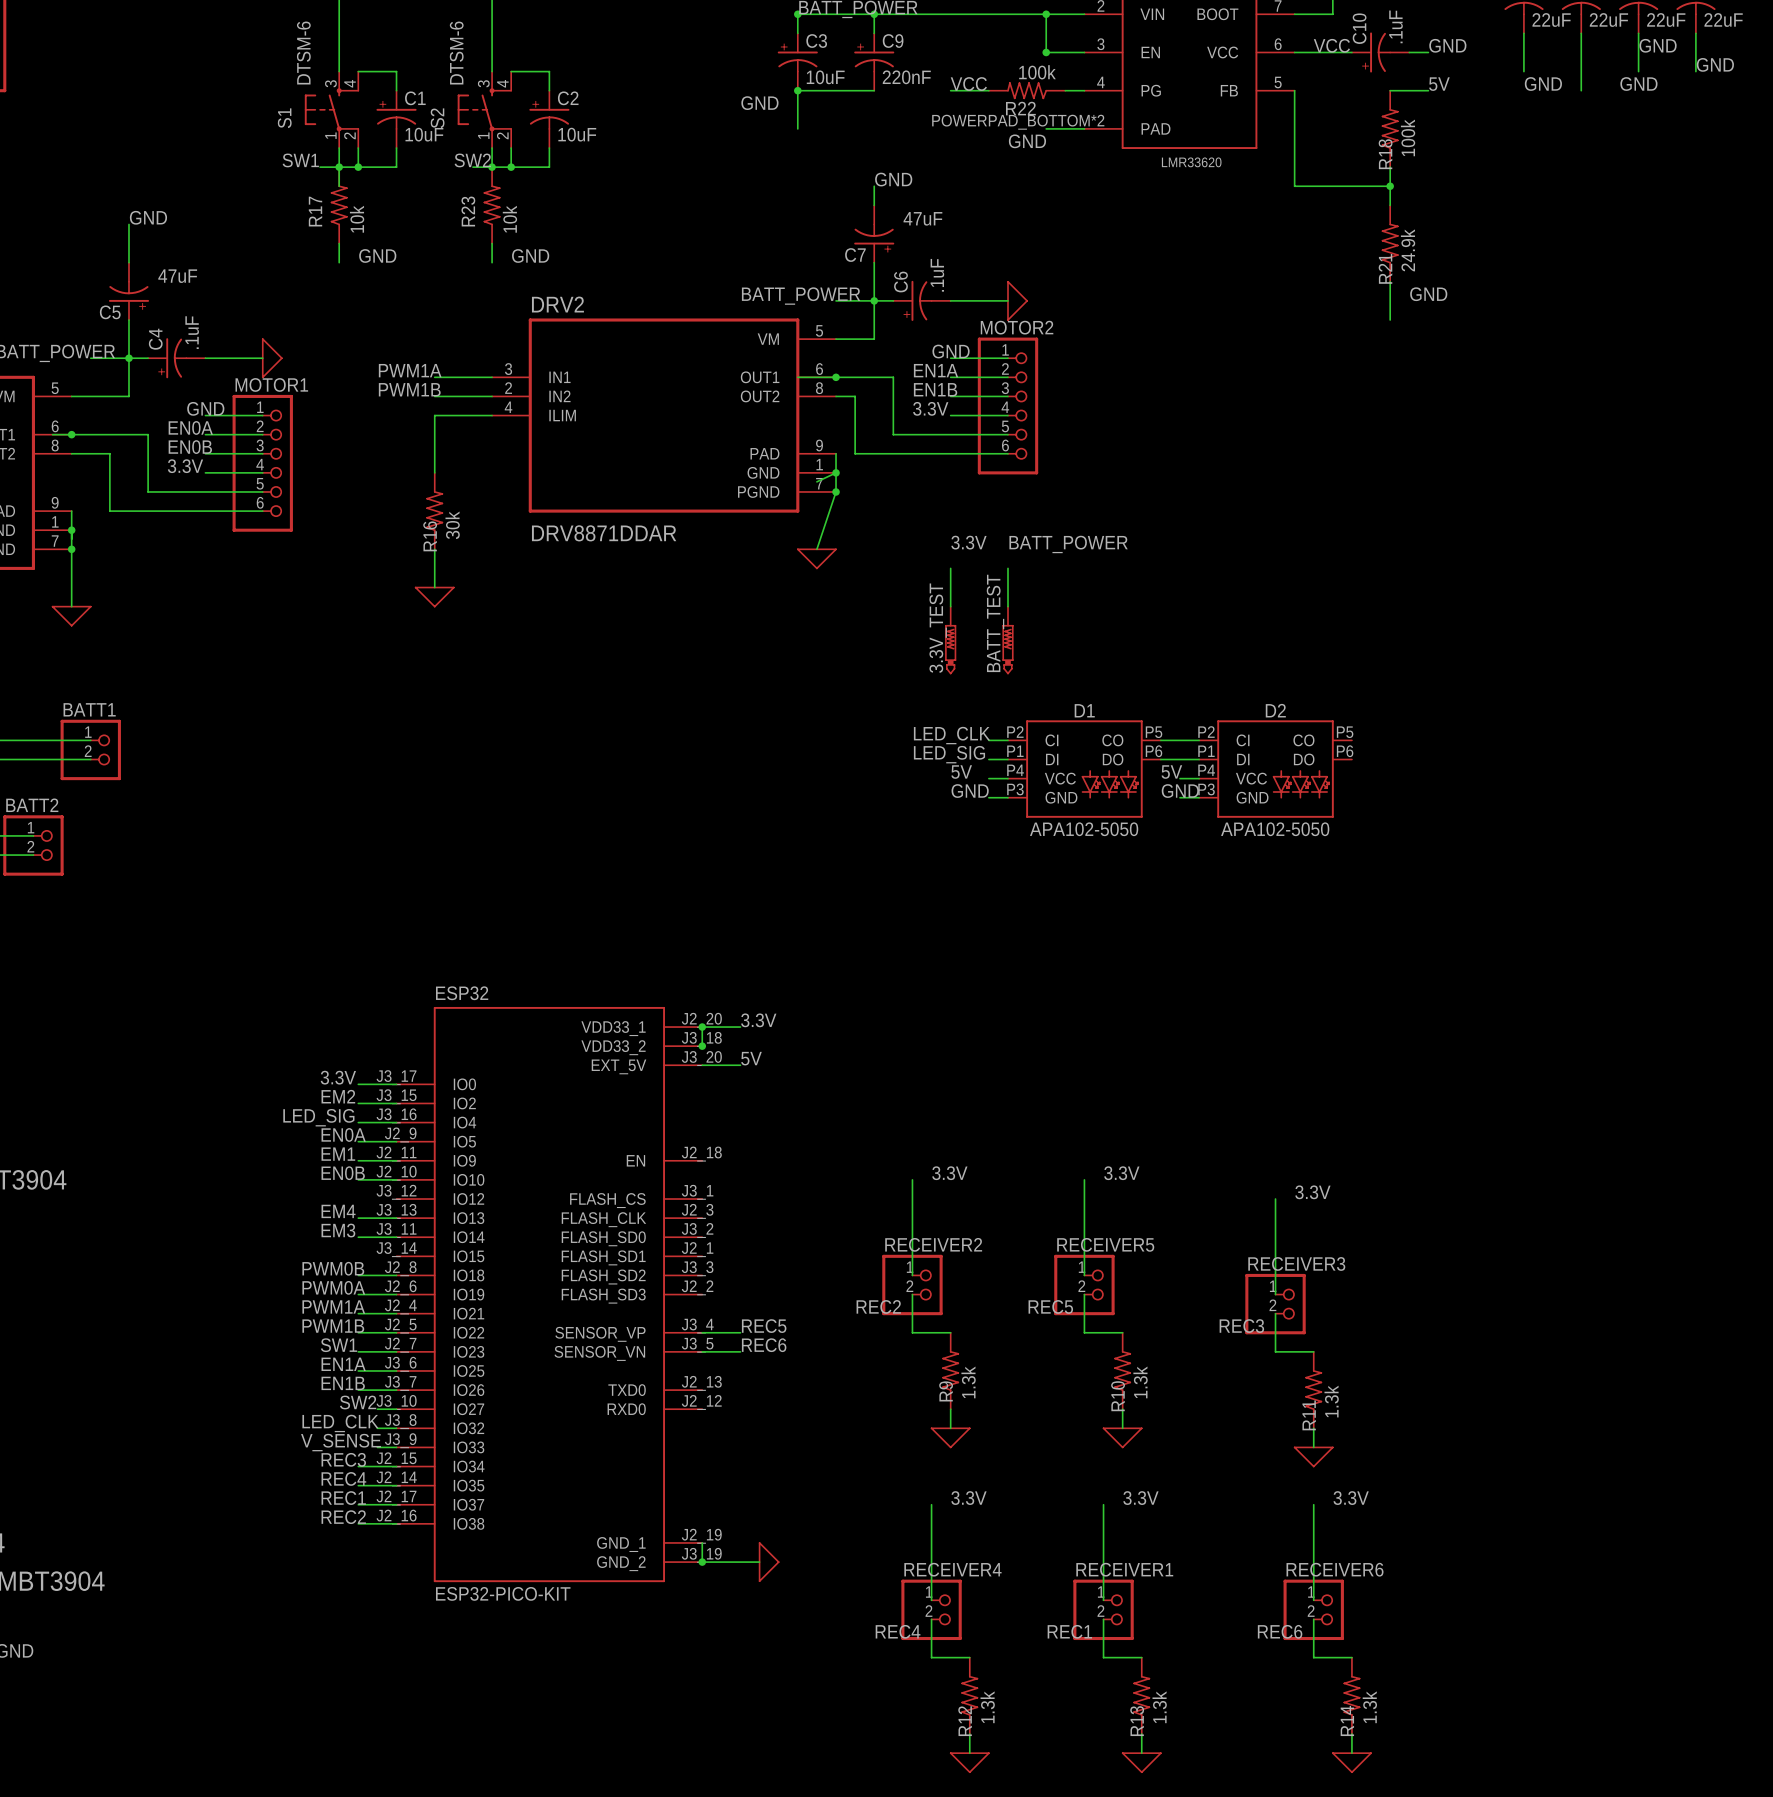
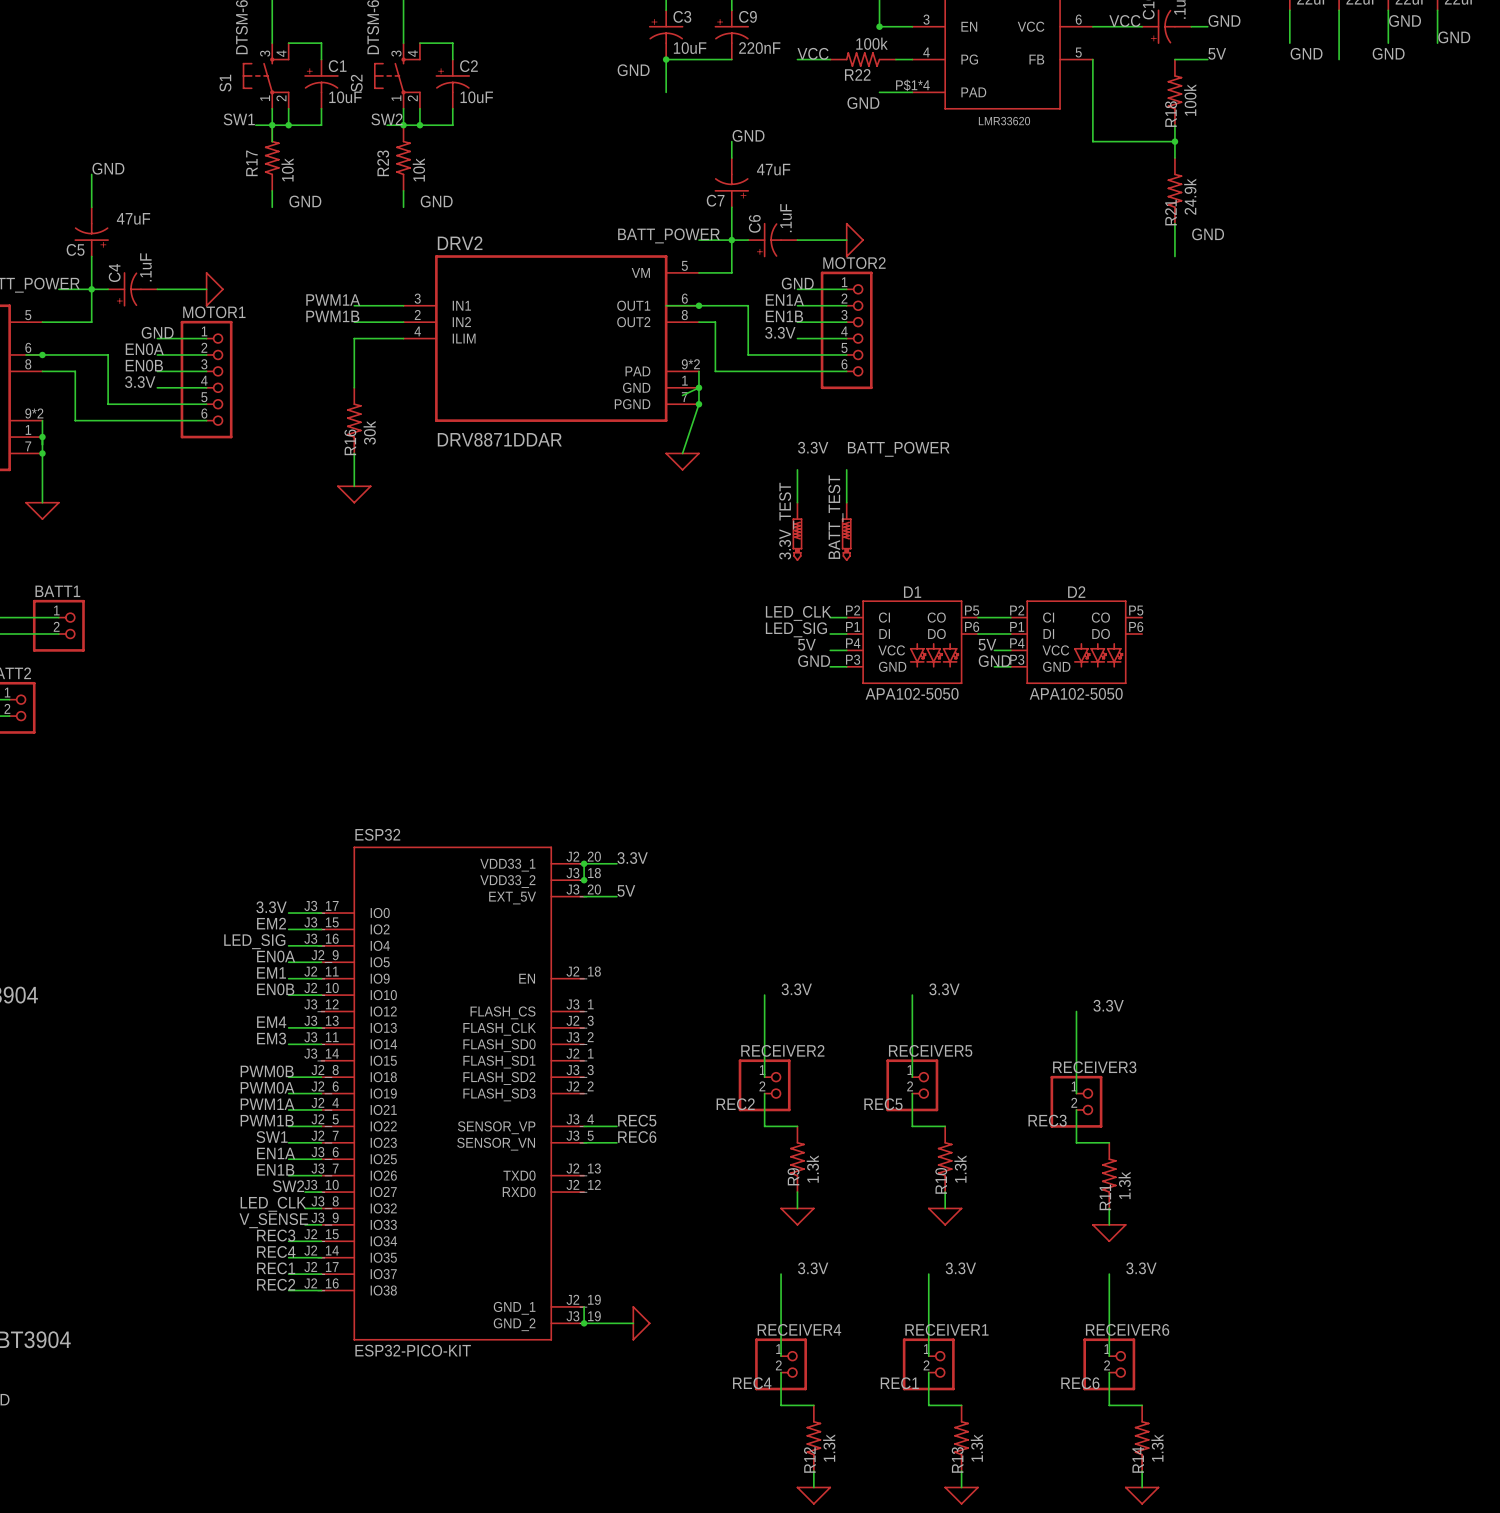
part pin number: POWERPAD_BOTTOM*2 (1018, 122) -> P$1*4 (912, 85)
DRV2 pin number: 9 (819, 445) -> 9*2 (690, 364)
part pin number: 9 (55, 502) -> 9*2 (34, 413)

